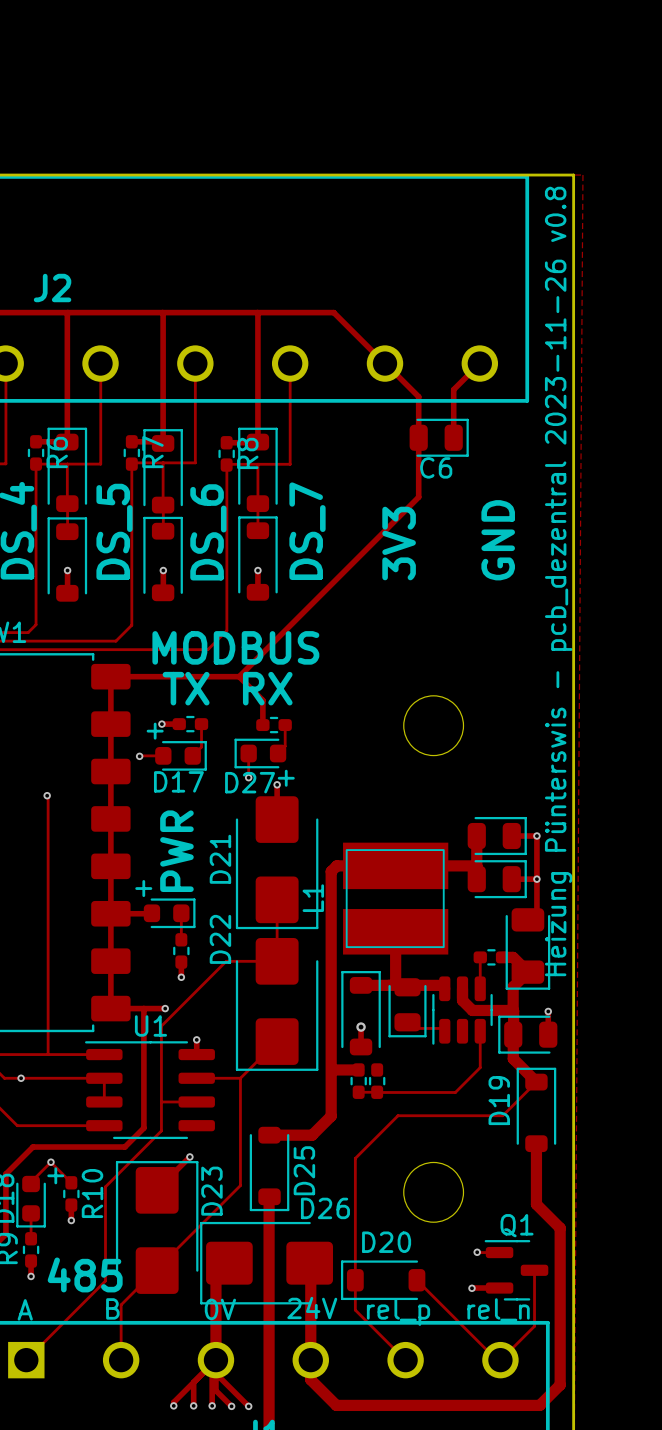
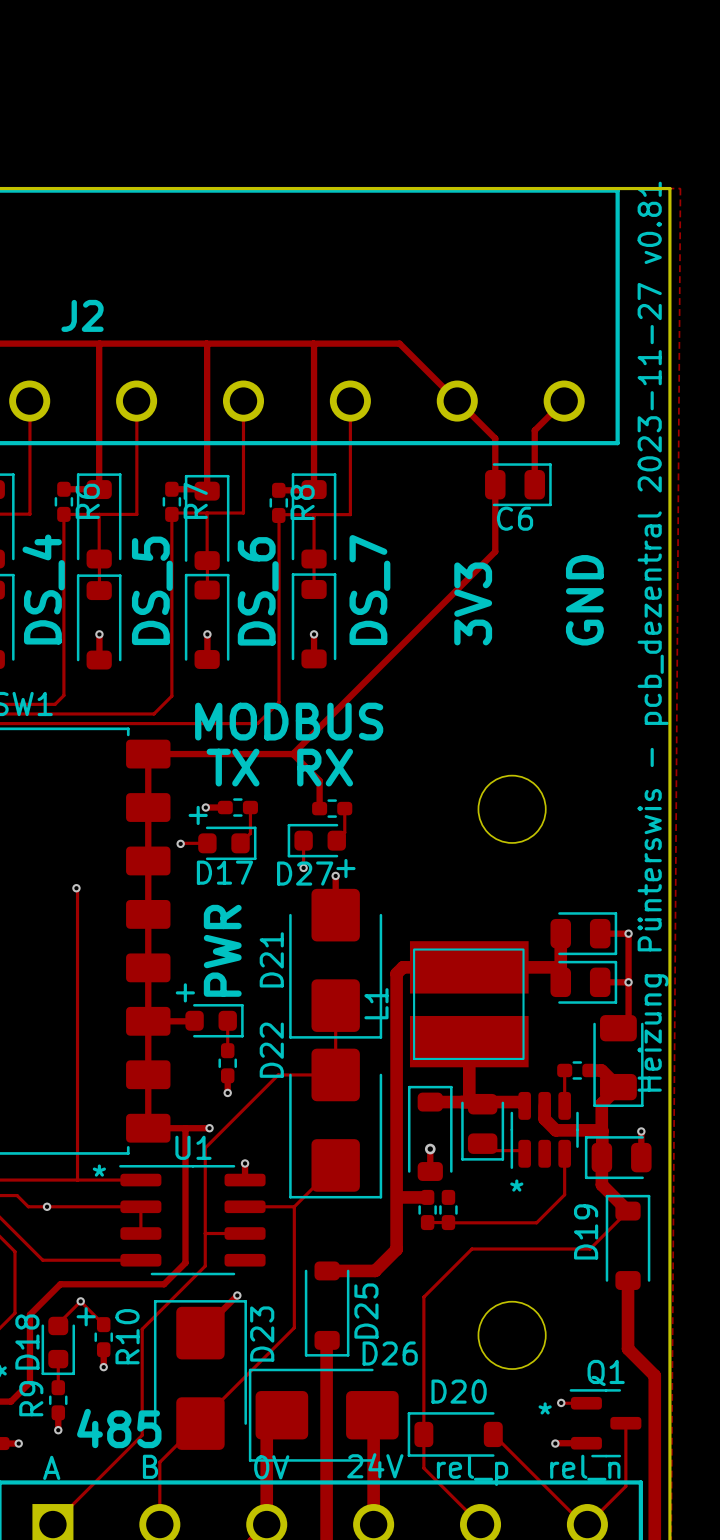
text: Heizung Pünterswis - pcb_dezentral 2023-11-26 v0.8 (558, 581) -> Heizung Pünterswis - pcb_dezentral 2023-11-27 v0.81 (653, 636)
text: none -> * (99, 1170)
text: none -> * (516, 1185)
text: none -> * (545, 1408)

